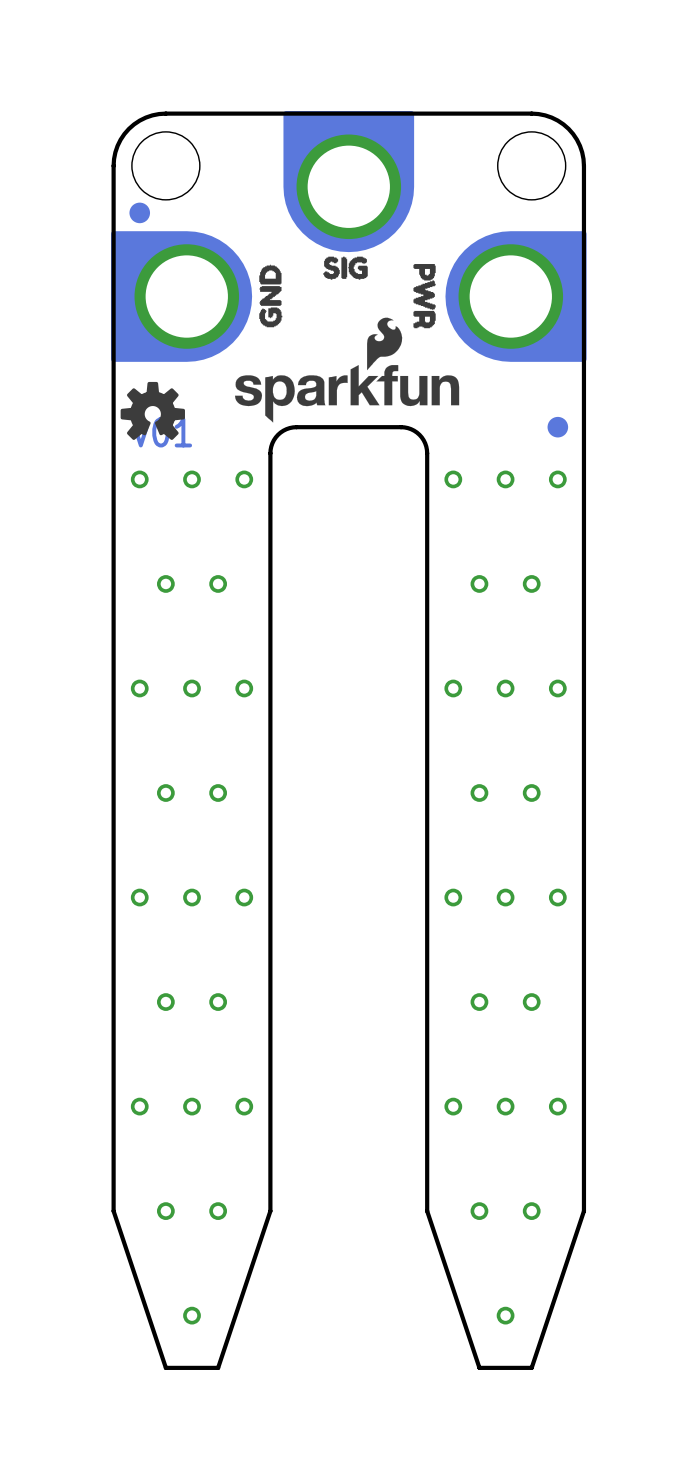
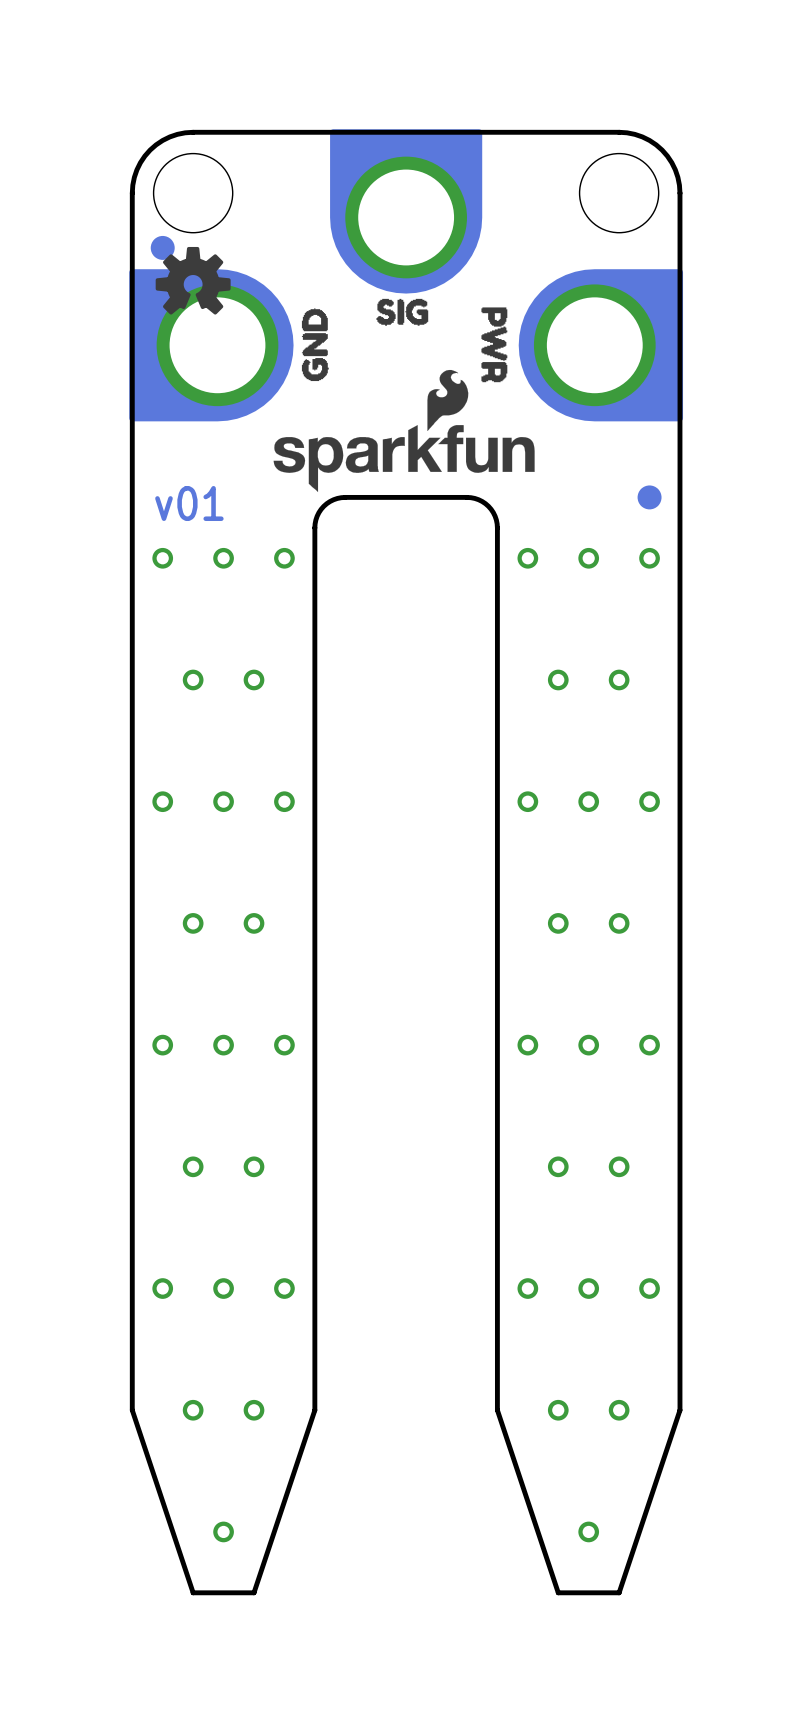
drawing position: (152, 410) -> (193, 280)

